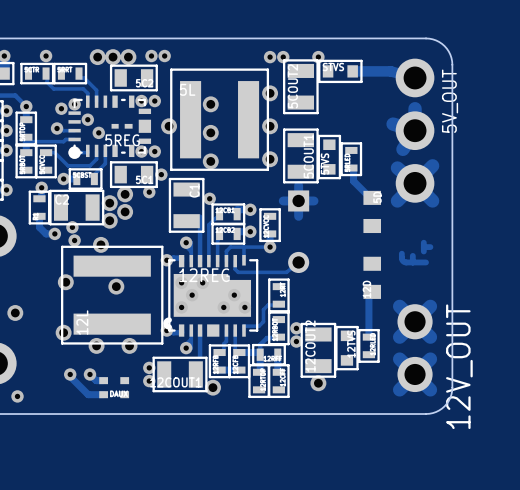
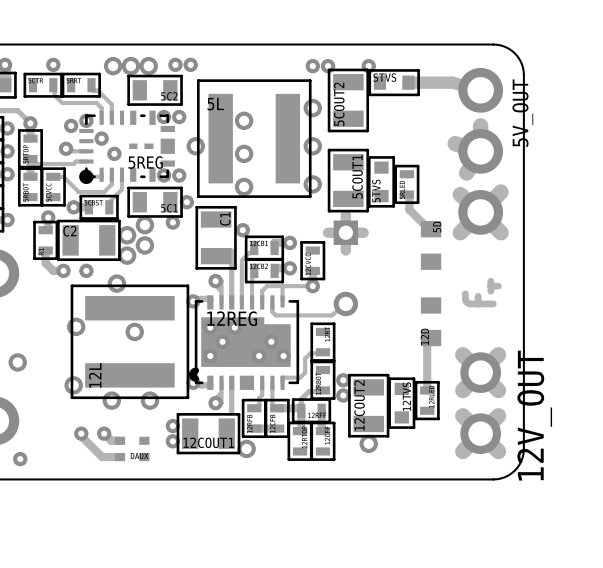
via: (72, 227) -> none
via: none -> (86, 270)
via: (74, 240) -> none

